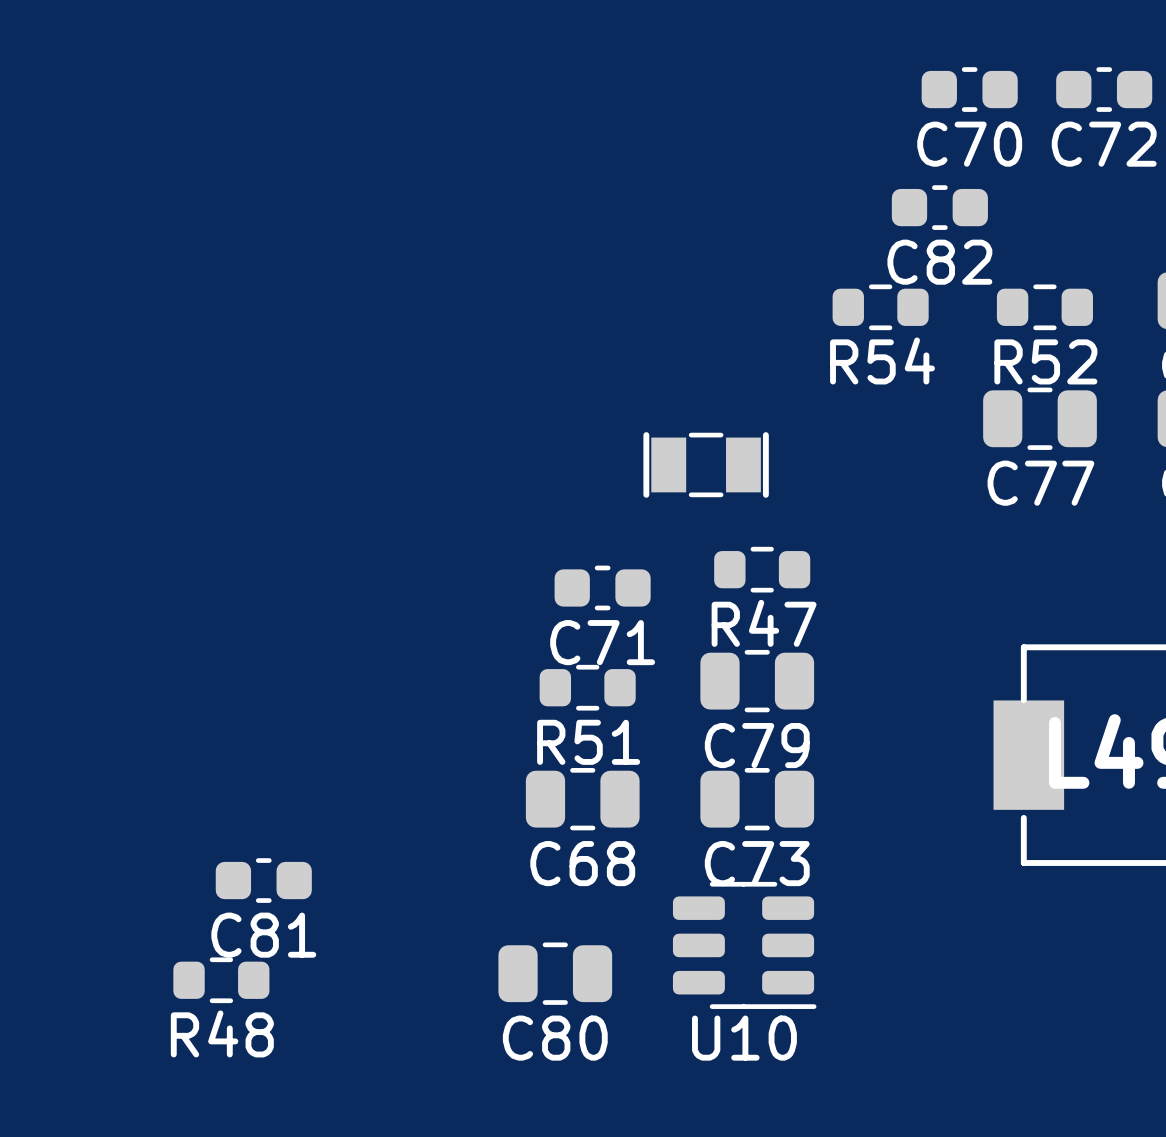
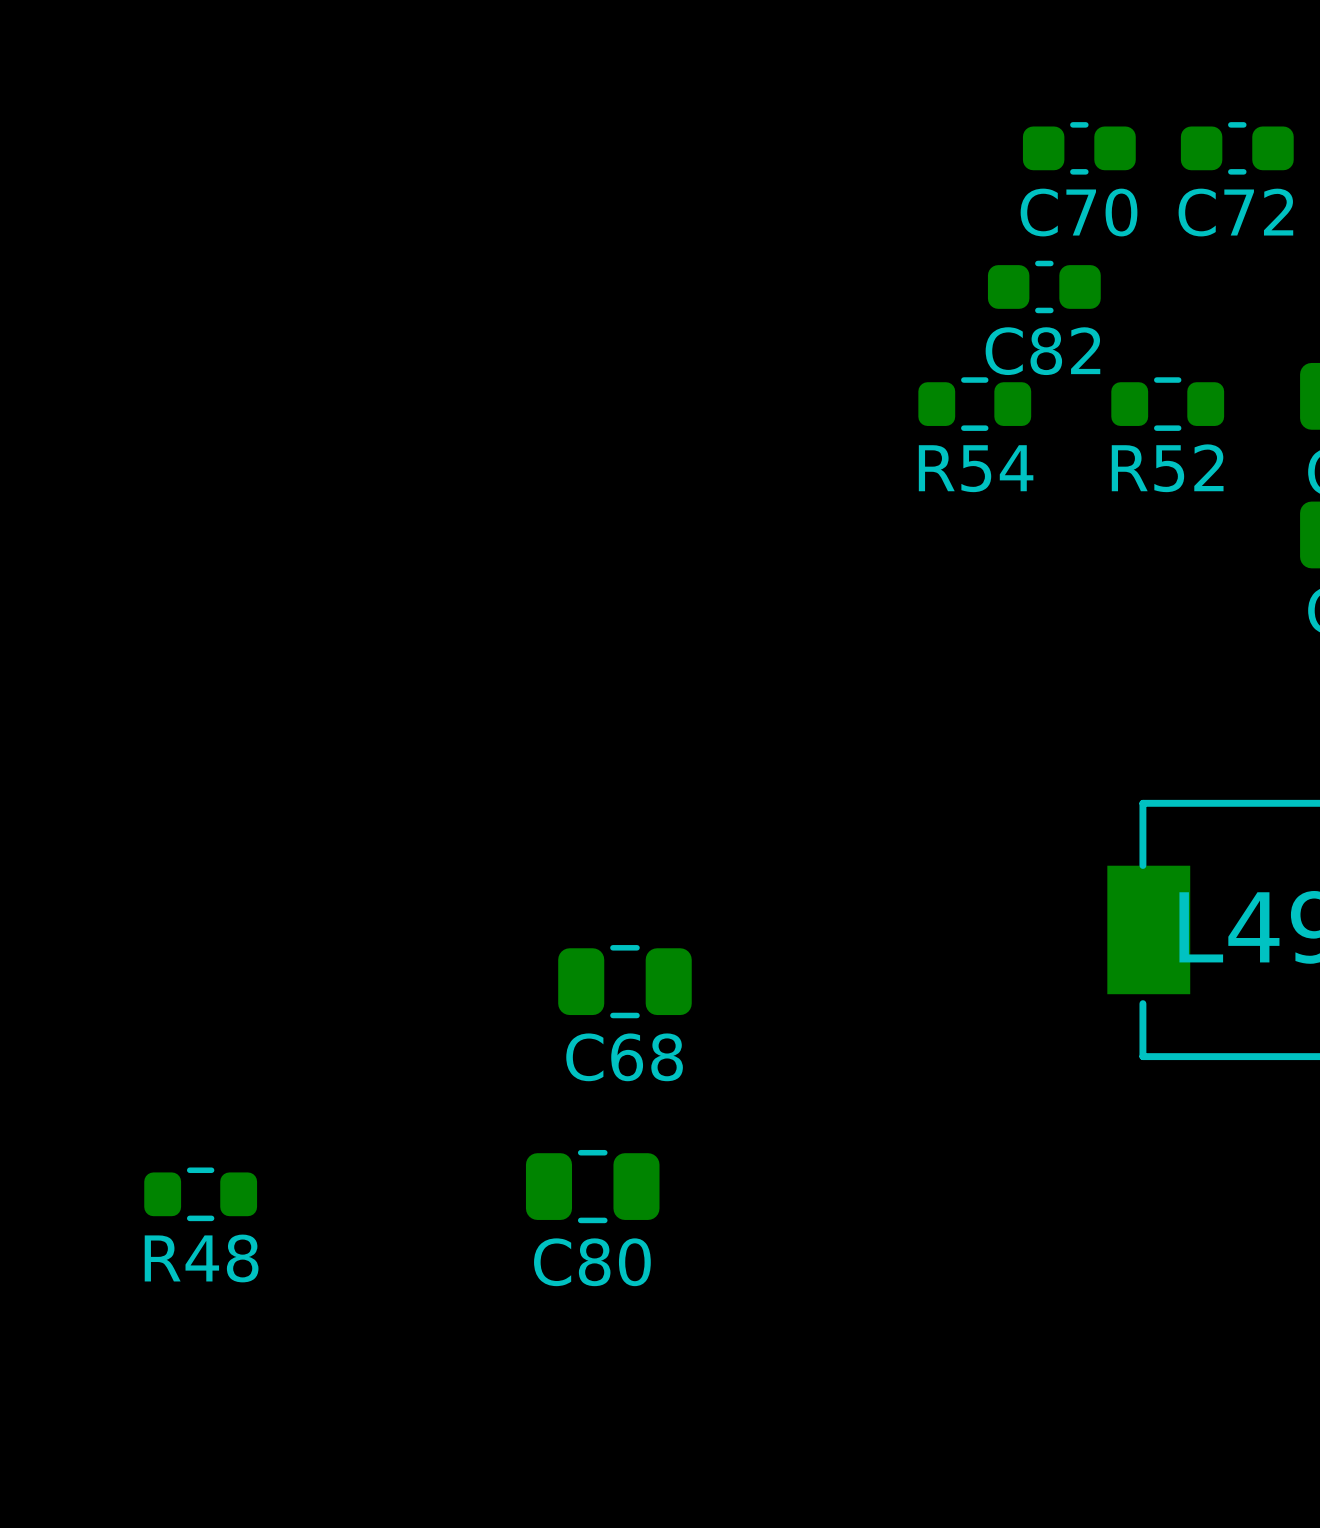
C77: (1040, 418) -> none
part: (706, 464) -> none
R47: (762, 569) -> none
C71: (602, 587) -> none
C79: (757, 681) -> none
R51: (587, 687) -> none
C73: (757, 799) -> none
C81: (263, 880) -> none
U10: (744, 945) -> none

